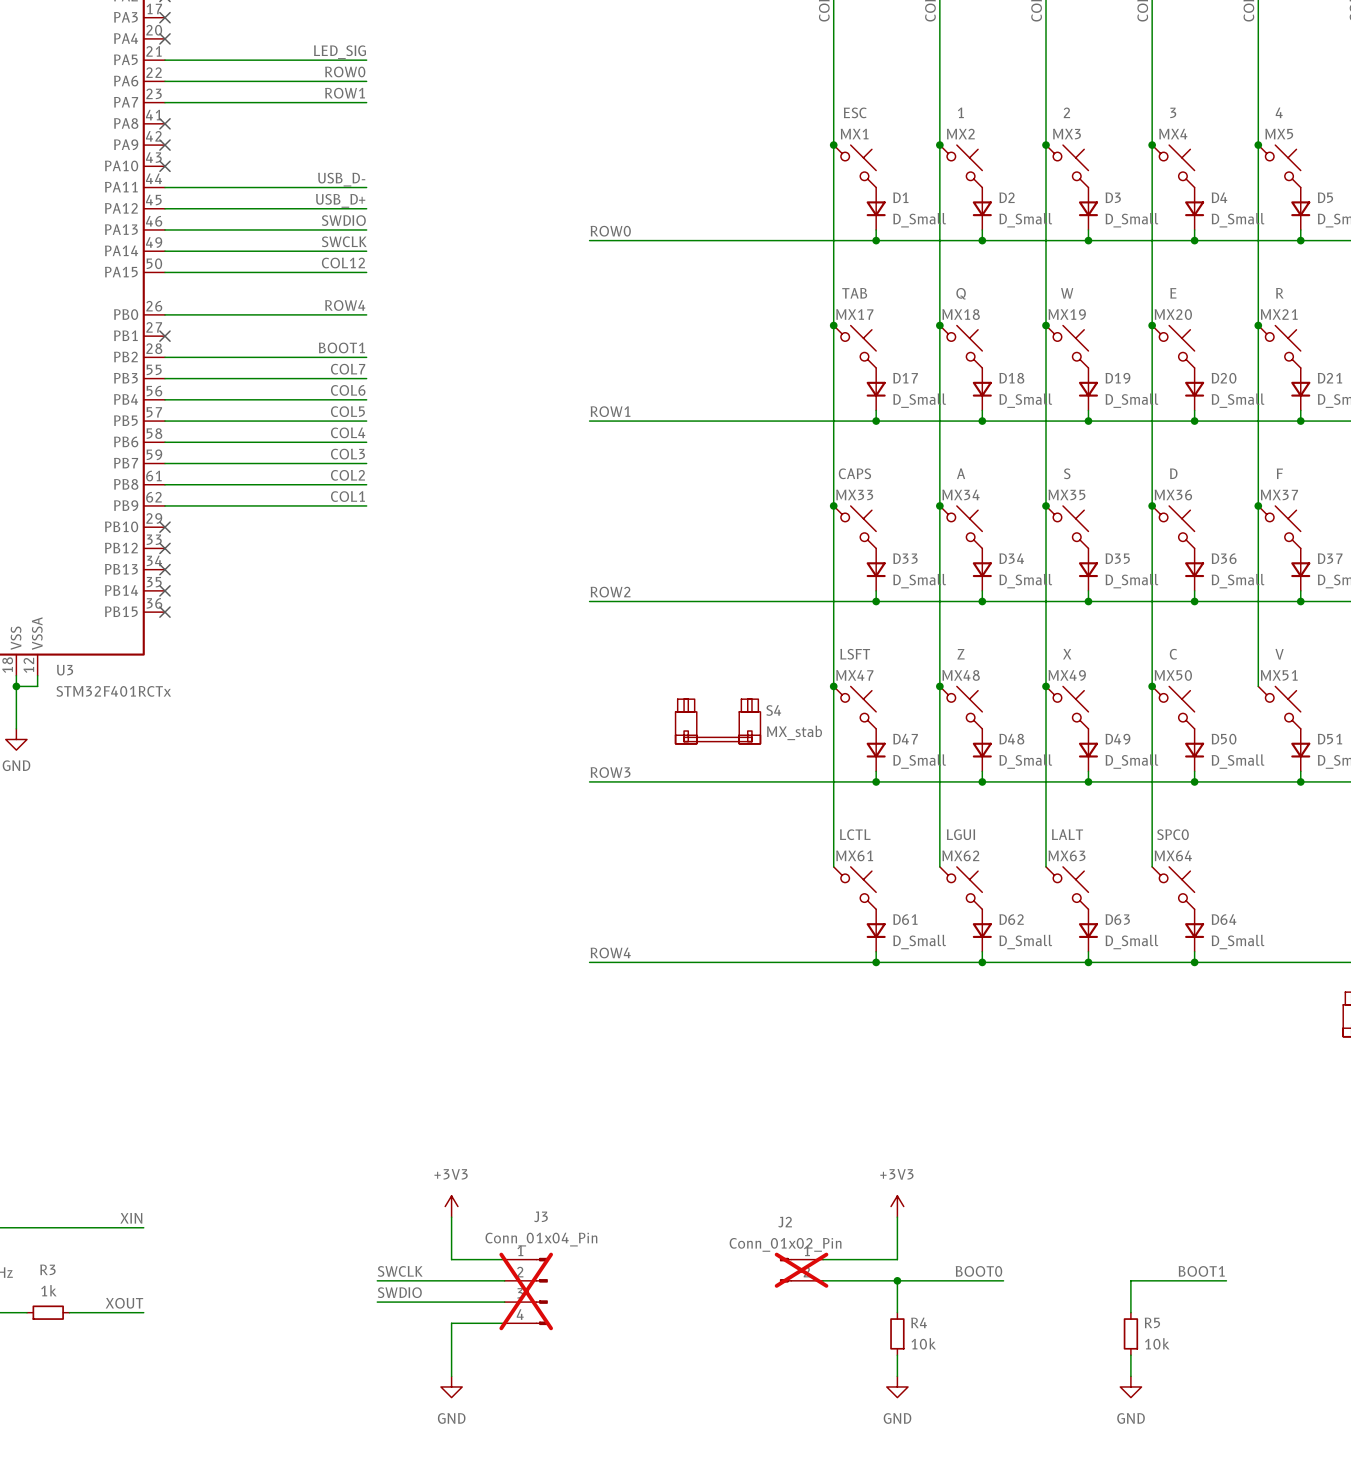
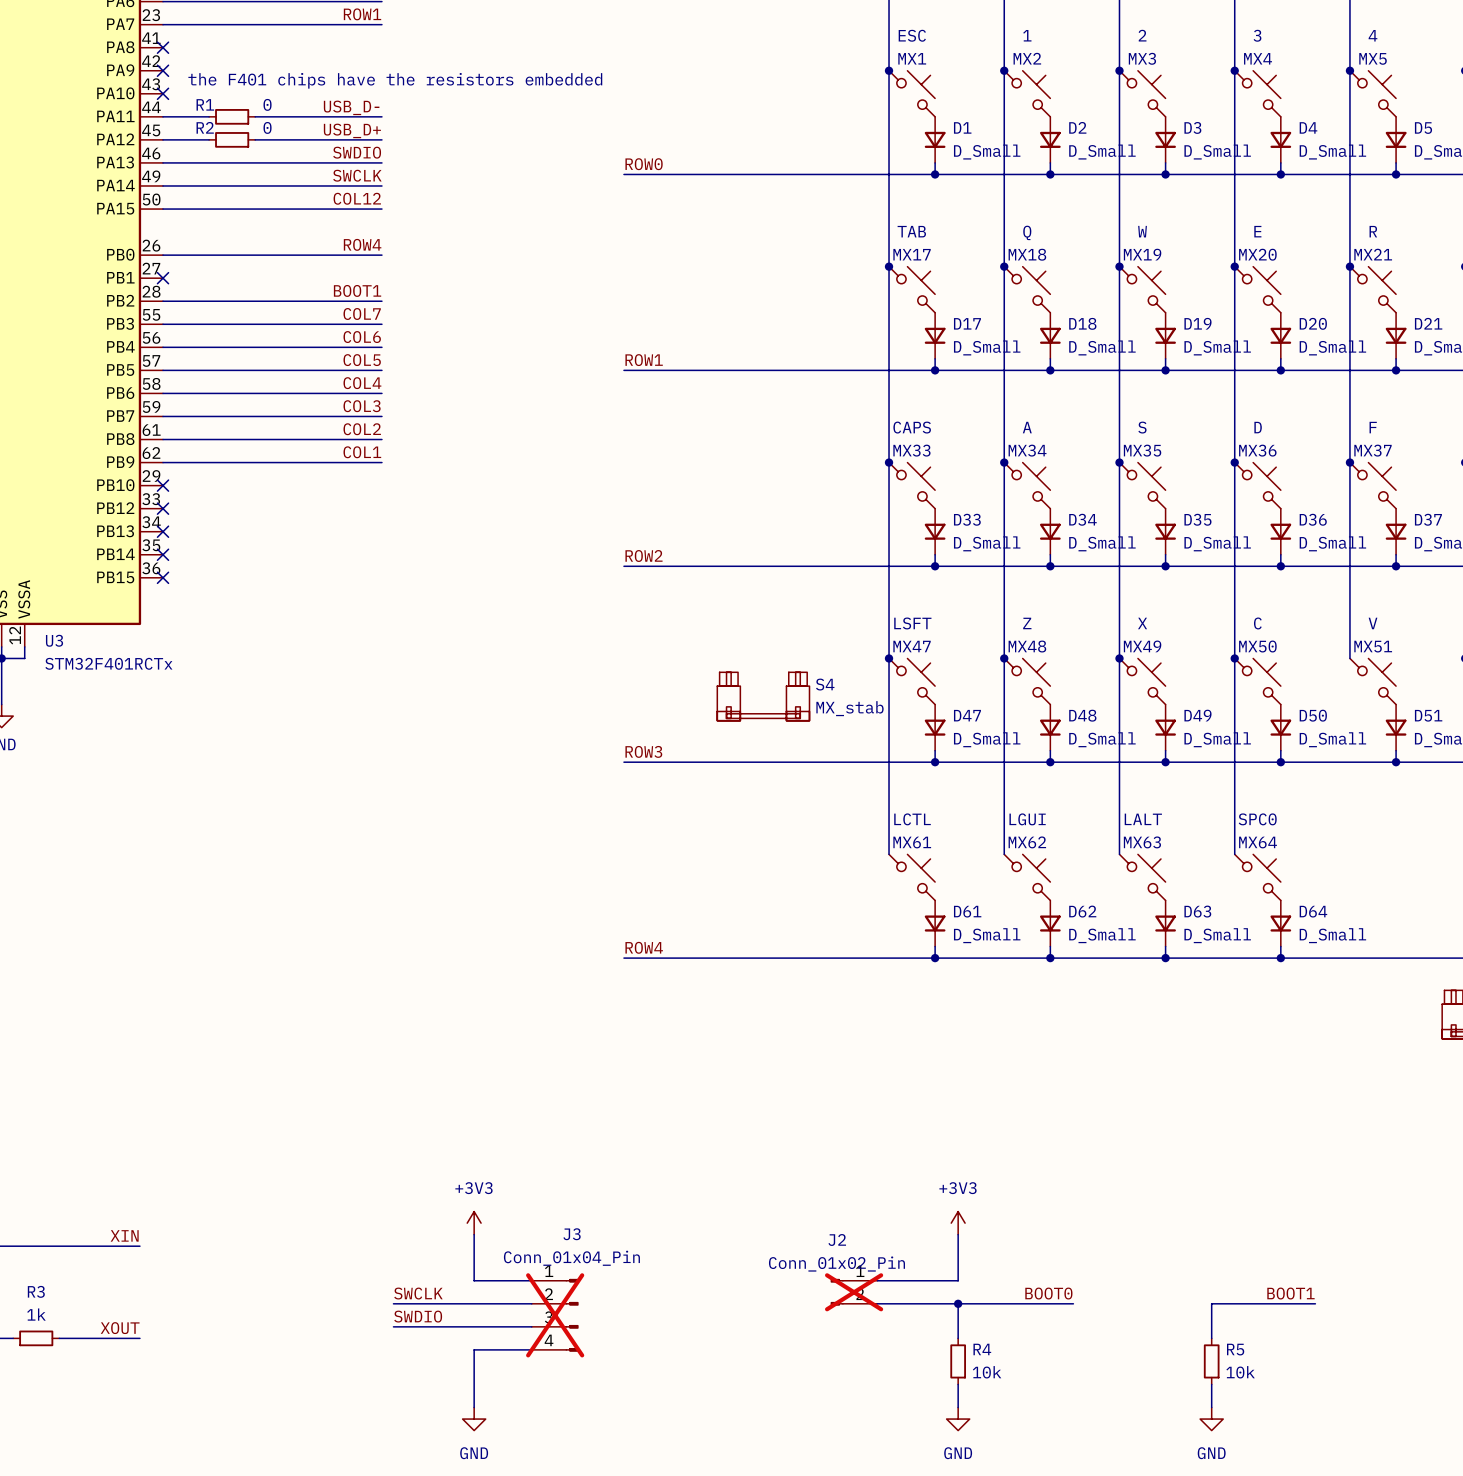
text: none -> the F401 chips have the resistors embedded (395, 80)
wire: (207, 187) (249, 187) -> none
R1: none -> 0 (232, 116)
wire: (207, 208) (249, 208) -> none
R2: none -> 0 (232, 139)

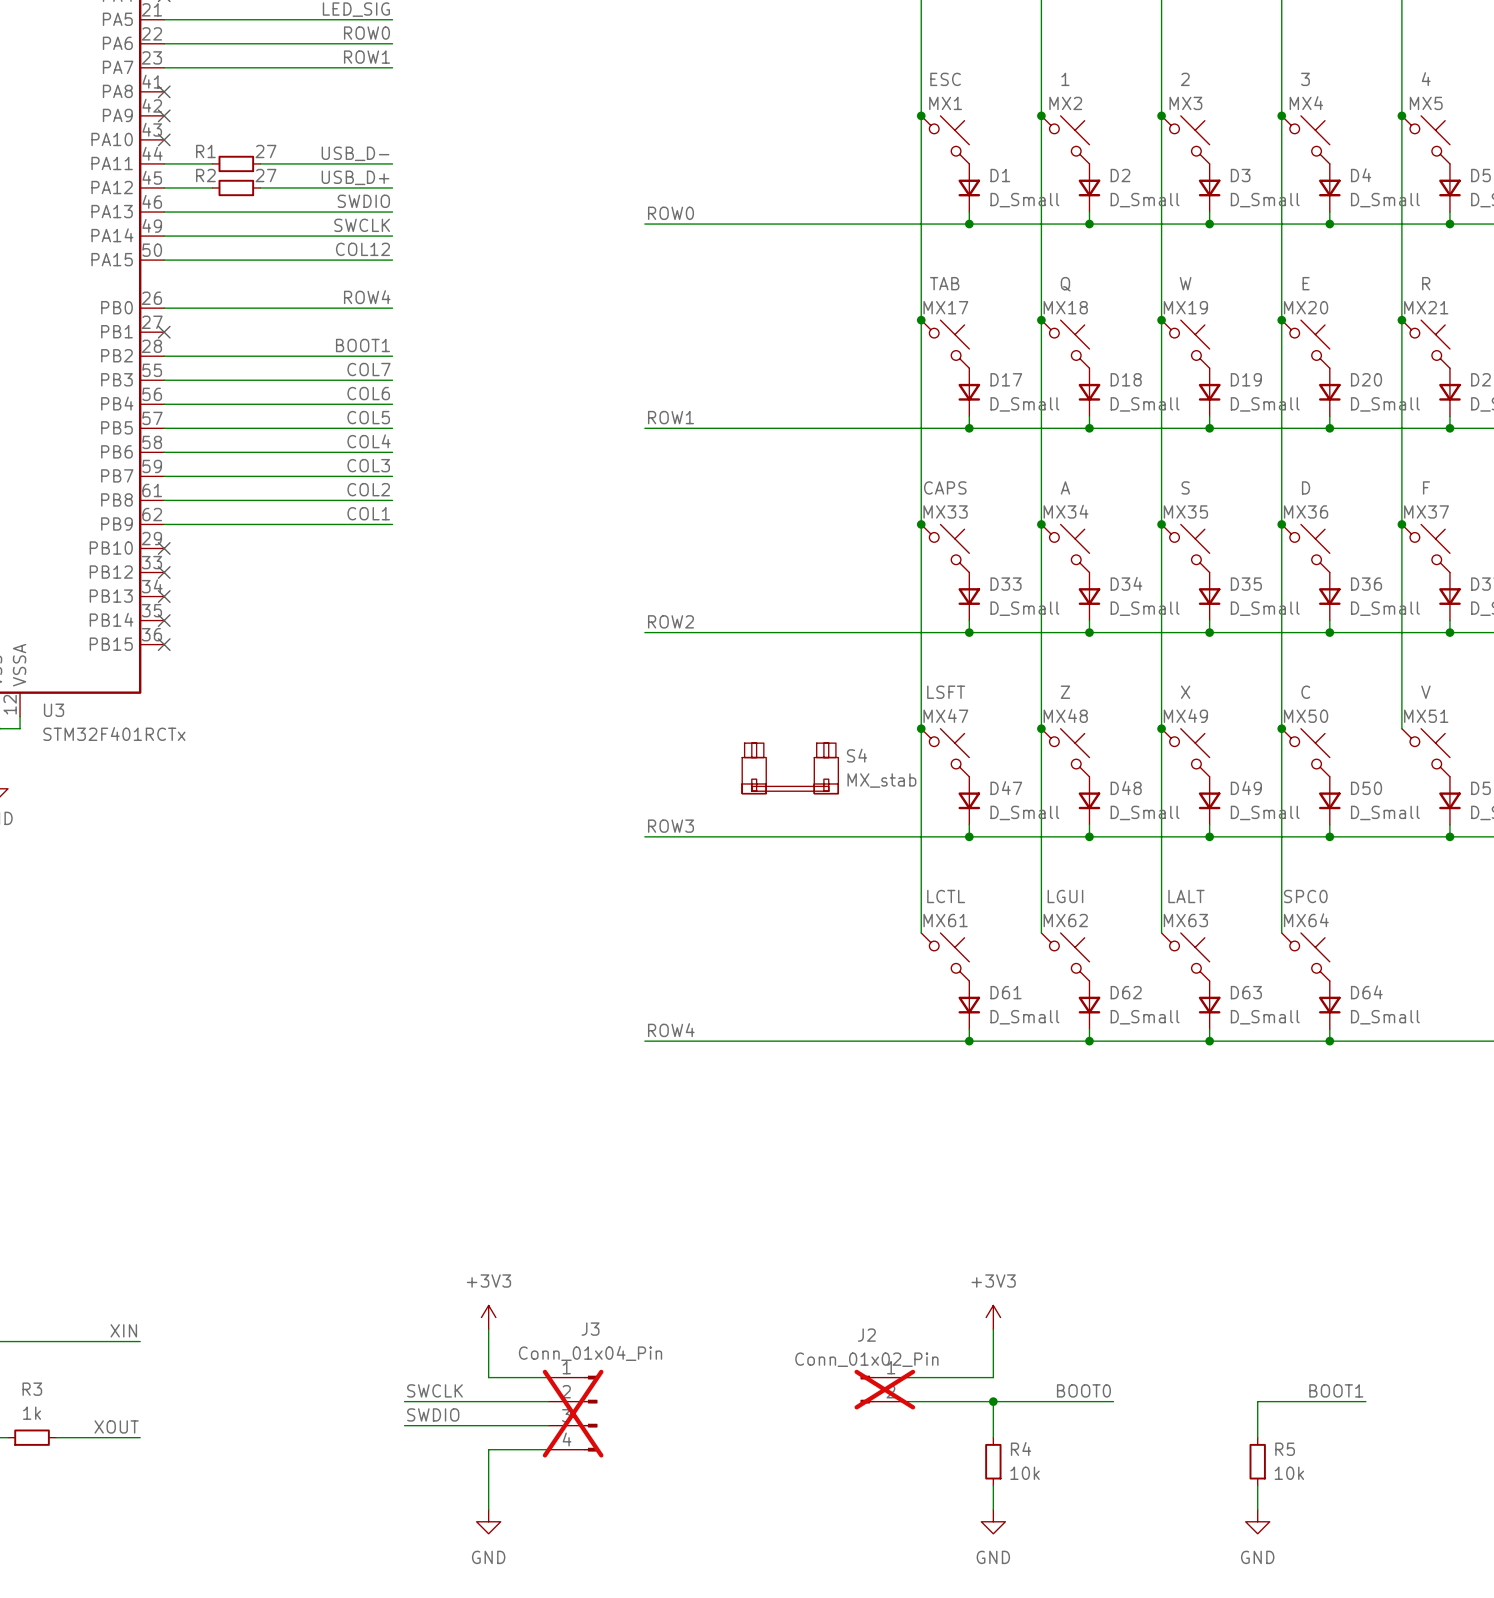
text: the F401 chips have the resistors embedded (395, 80) -> none
R1 value: 0 (267, 104) -> 27 (265, 151)
R2 value: 0 (267, 127) -> 27 (265, 175)

